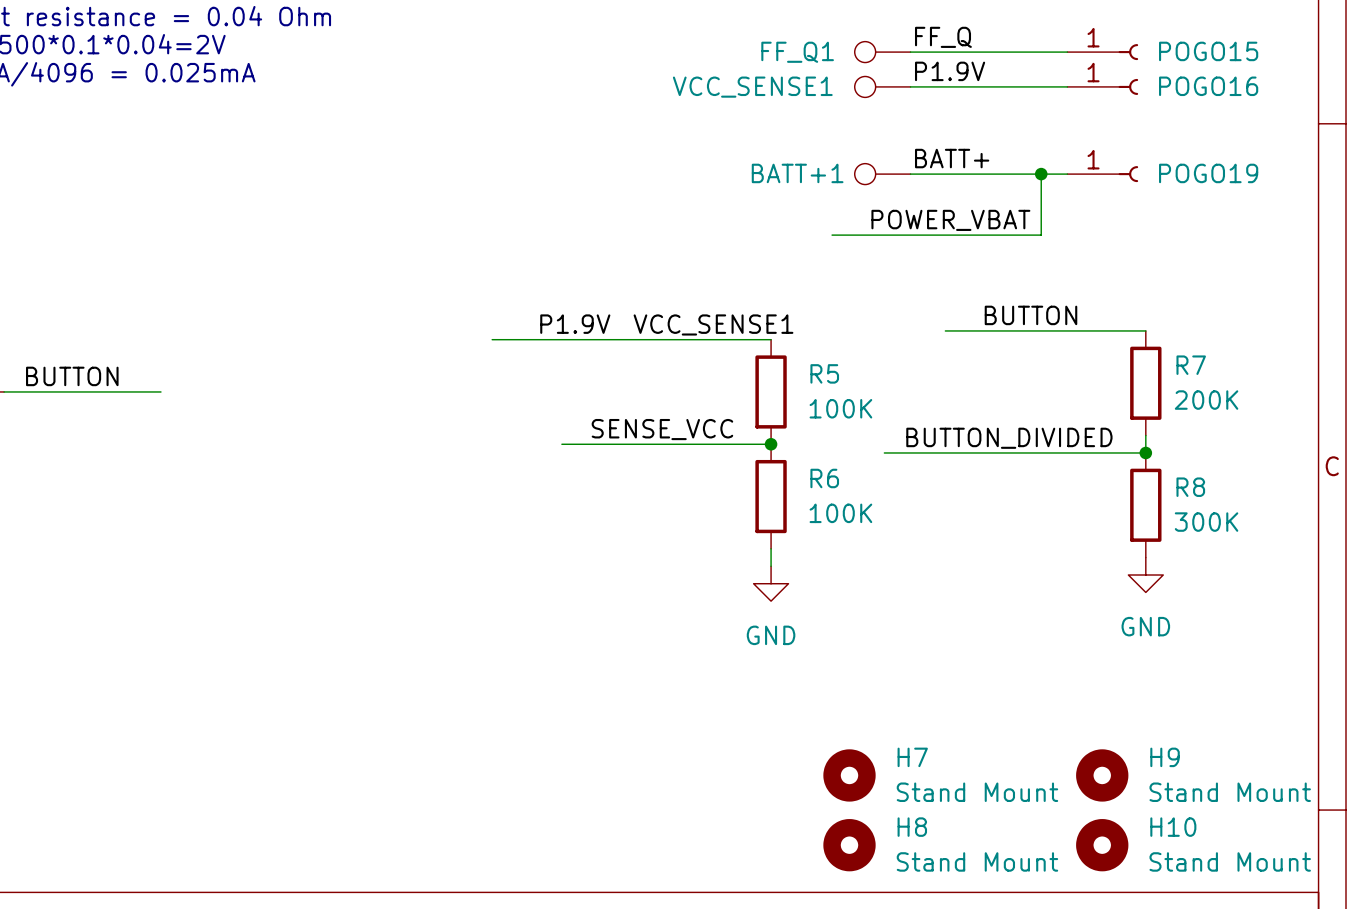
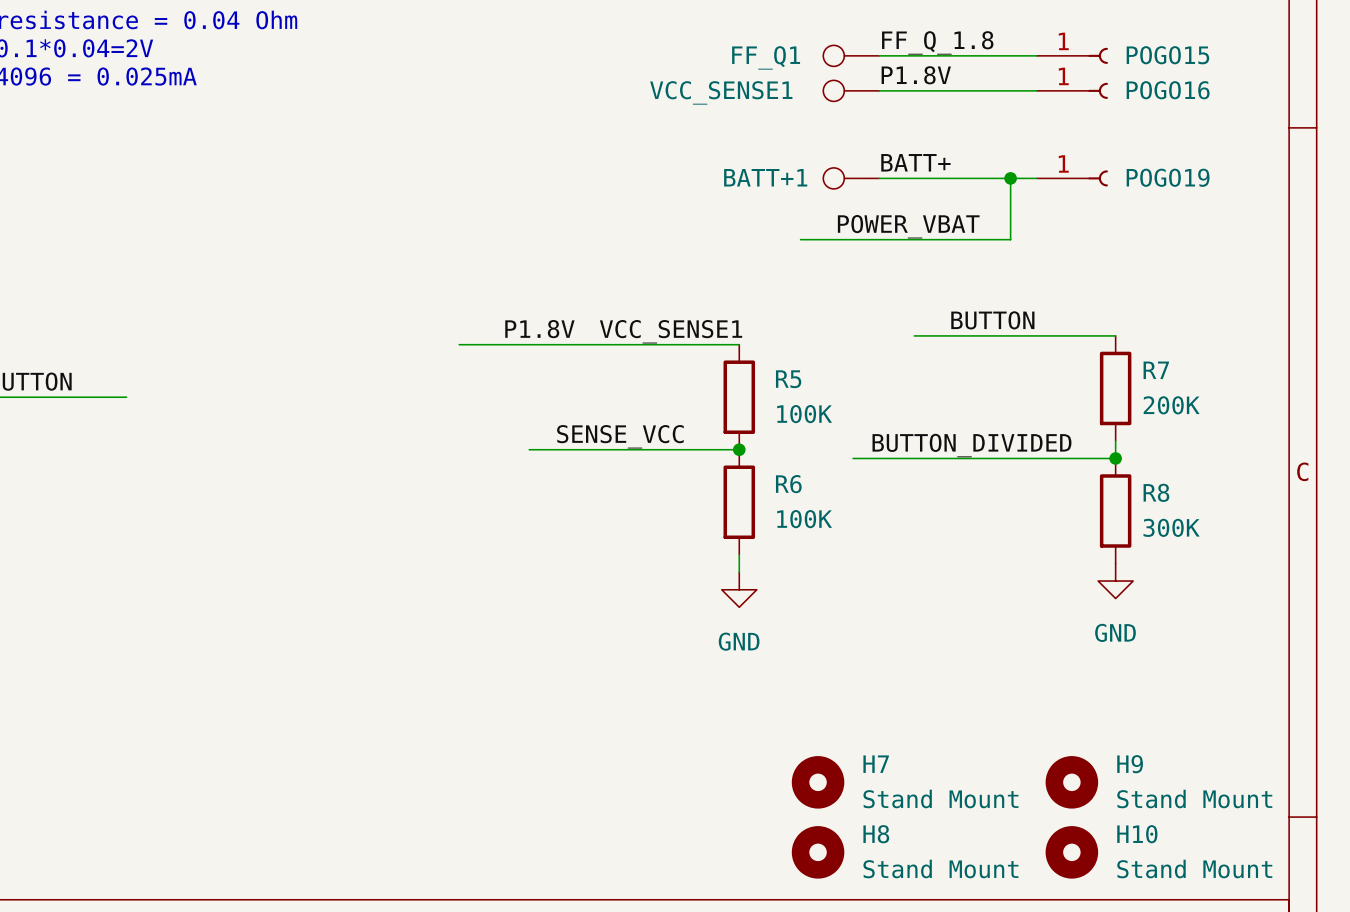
label: FF_Q (943, 37) -> FF_Q_1.8 (937, 42)
label: P1.9V (950, 71) -> P1.8V (916, 75)
label: P1.9V (575, 324) -> P1.8V (539, 329)

